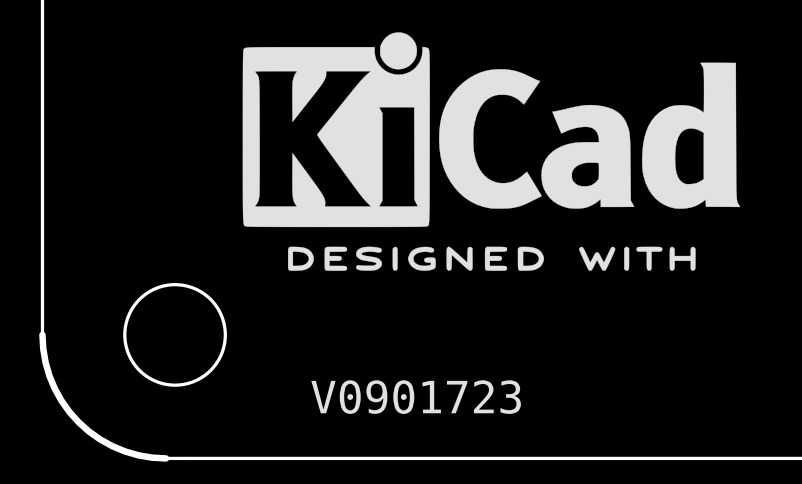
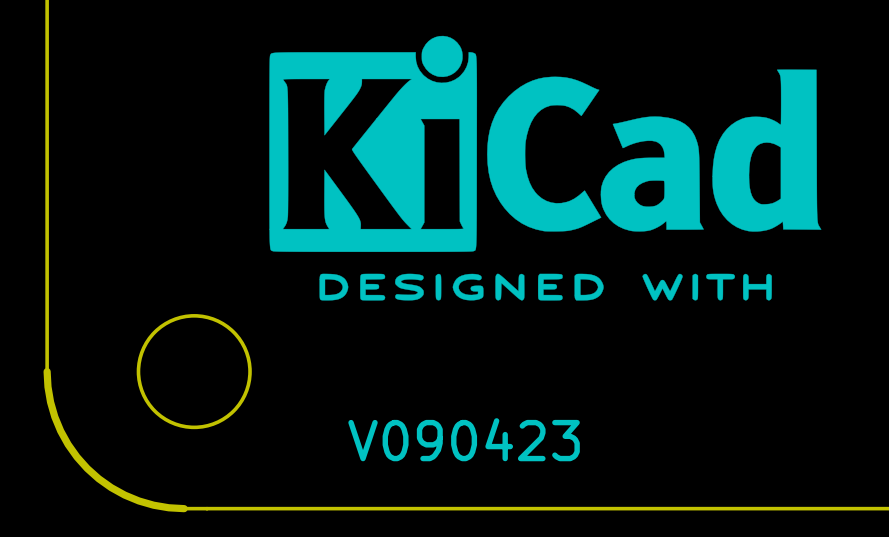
text: V0901723 (416, 397) -> V090423 (464, 439)

